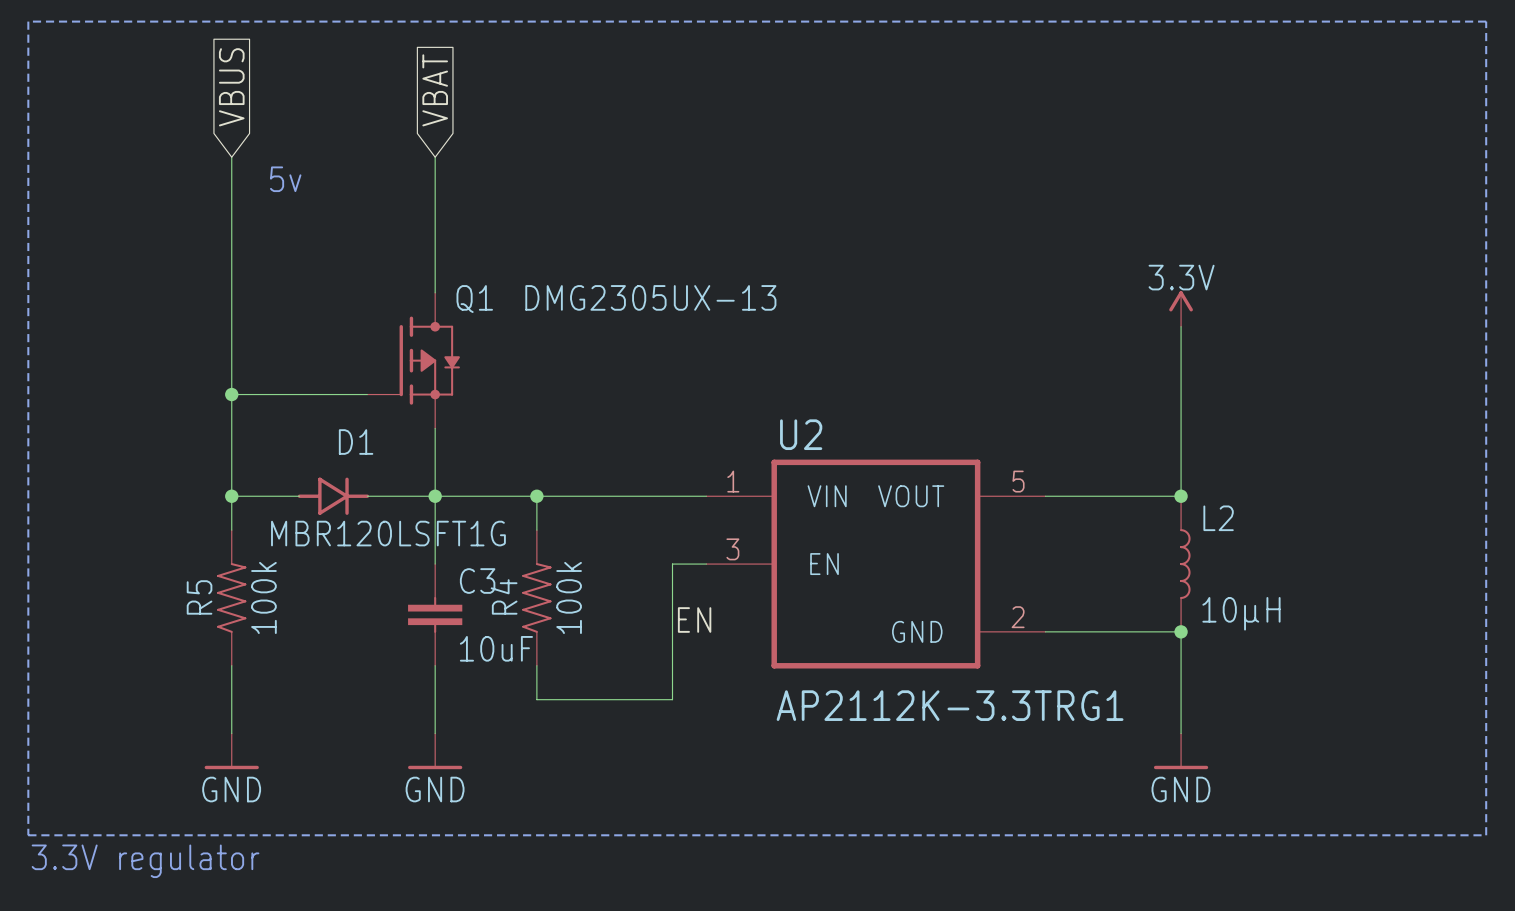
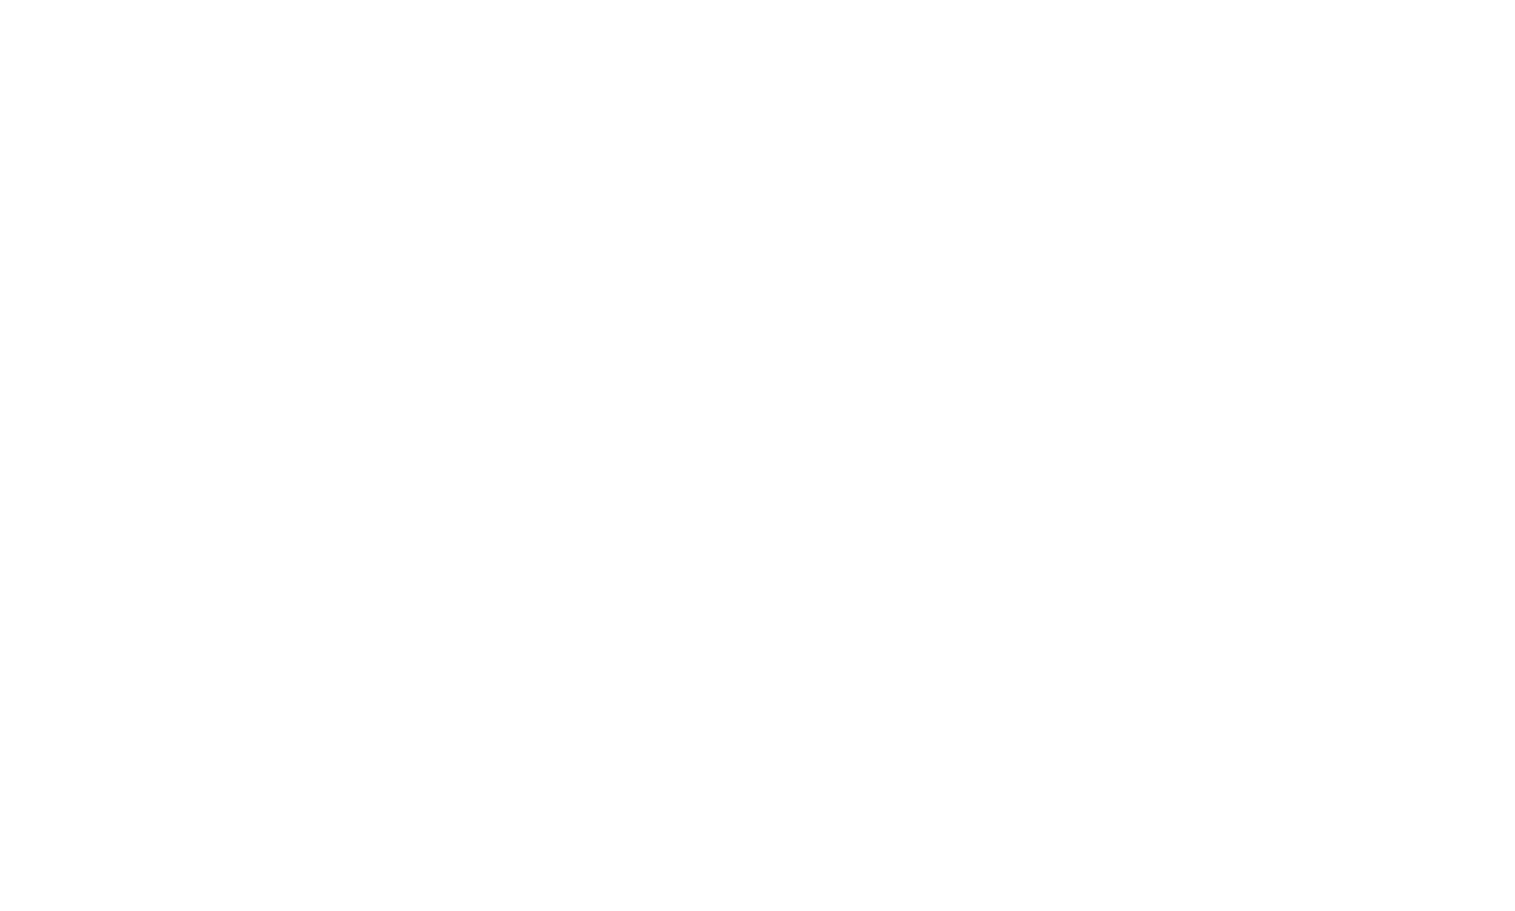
line: (28, 21) (28, 835) (1486, 835) (1486, 21) (28, 21) -> none
global label: VBUS (231, 87) -> none
global label: VBAT (435, 90) -> none
wire: (231, 157) (231, 530) -> none
wire: (435, 157) (435, 292) -> none
text: 5v (285, 179) -> none
power symbol: 3.3V (1181, 308) -> none
wire: (1181, 326) (1181, 496) (1045, 496) -> none
Q1: DMG2305UX-13 (413, 360) -> none
wire: (231, 394) (367, 394) -> none
junction: (231, 394) -> none
wire: (435, 428) (435, 564) -> none
wire: (231, 496) (299, 496) -> none
junction: (231, 496) -> none
D1: MBR120LSFT1G (333, 496) -> none
wire: (367, 496) (706, 496) -> none
junction: (435, 496) -> none
wire: (536, 496) (536, 530) -> none
junction: (536, 496) -> none
junction: (1181, 496) -> none
wire: (706, 564) (672, 564) (672, 699) (536, 699) (536, 665) -> none
U2: AP2112K-3.3TRG1 (875, 564) -> none
L2: 10μH (1185, 564) -> none
R5: 100k (231, 597) -> none
R4: 100k (536, 597) -> none
C3: 10uF (435, 614) -> none
label: EN (694, 620) -> none
wire: (1045, 631) (1181, 631) (1181, 733) -> none
junction: (1181, 631) -> none
wire: (231, 665) (231, 733) -> none
wire: (435, 665) (435, 733) -> none
power symbol: GND (231, 751) -> none
power symbol: GND (435, 751) -> none
power symbol: GND (1181, 751) -> none
text: 3.3V regulator (145, 861) -> none

